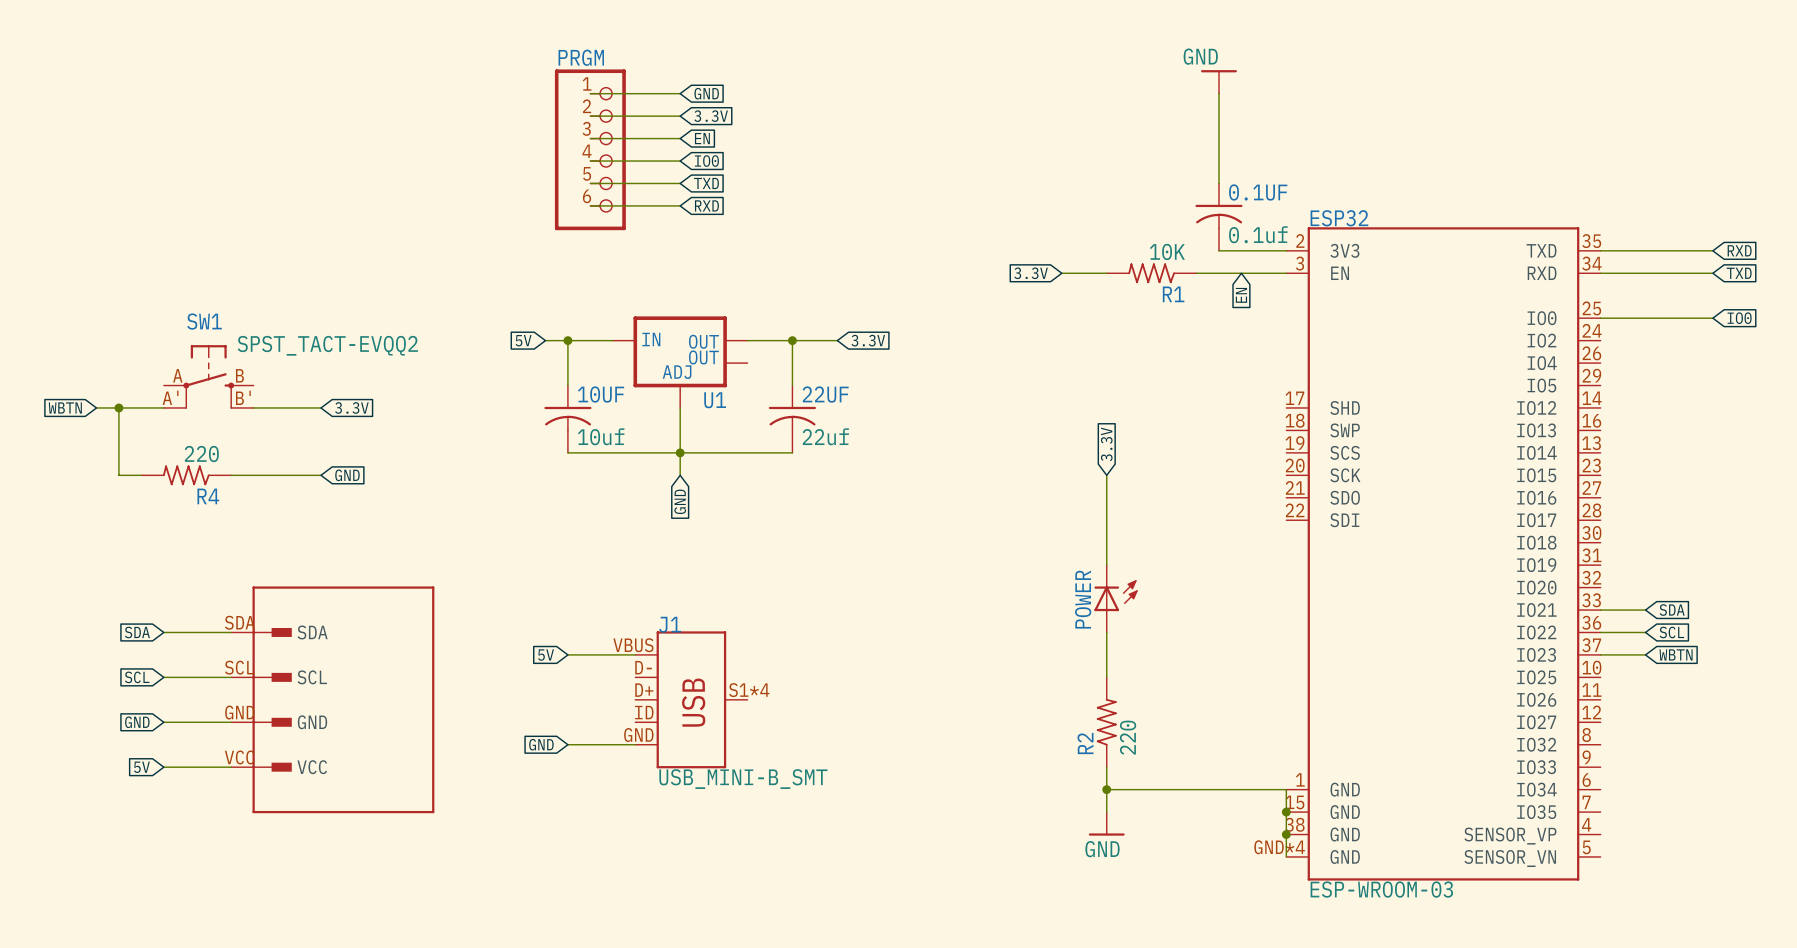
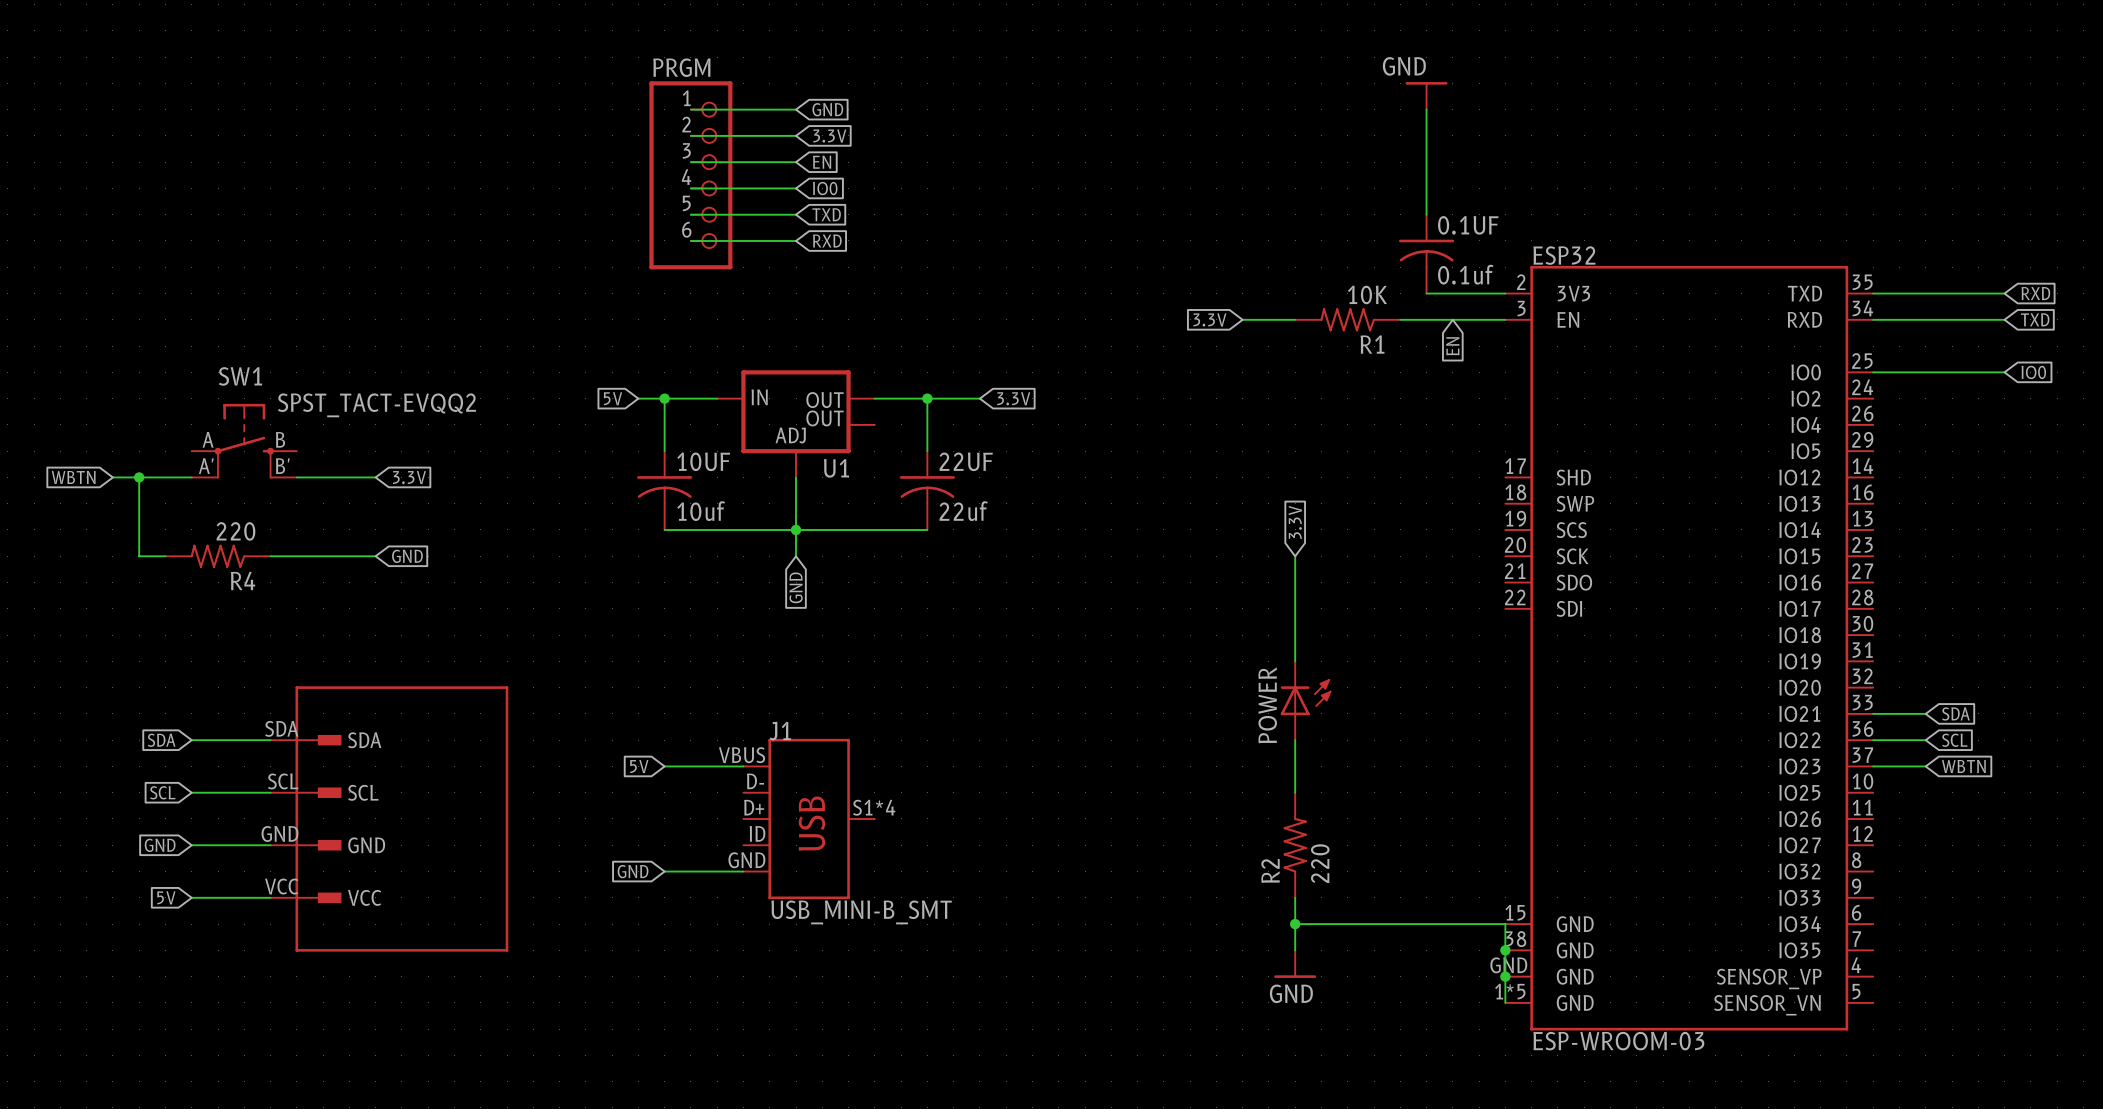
ESP32 pin number: 1 (1300, 779) -> 15 (1515, 912)
ESP32 pin number: 15 (1294, 802) -> 38 (1515, 939)
ESP32 pin number: 38 (1295, 824) -> GND (1508, 965)
ESP32 pin number: GND*4 (1279, 847) -> 1*5 (1510, 991)

